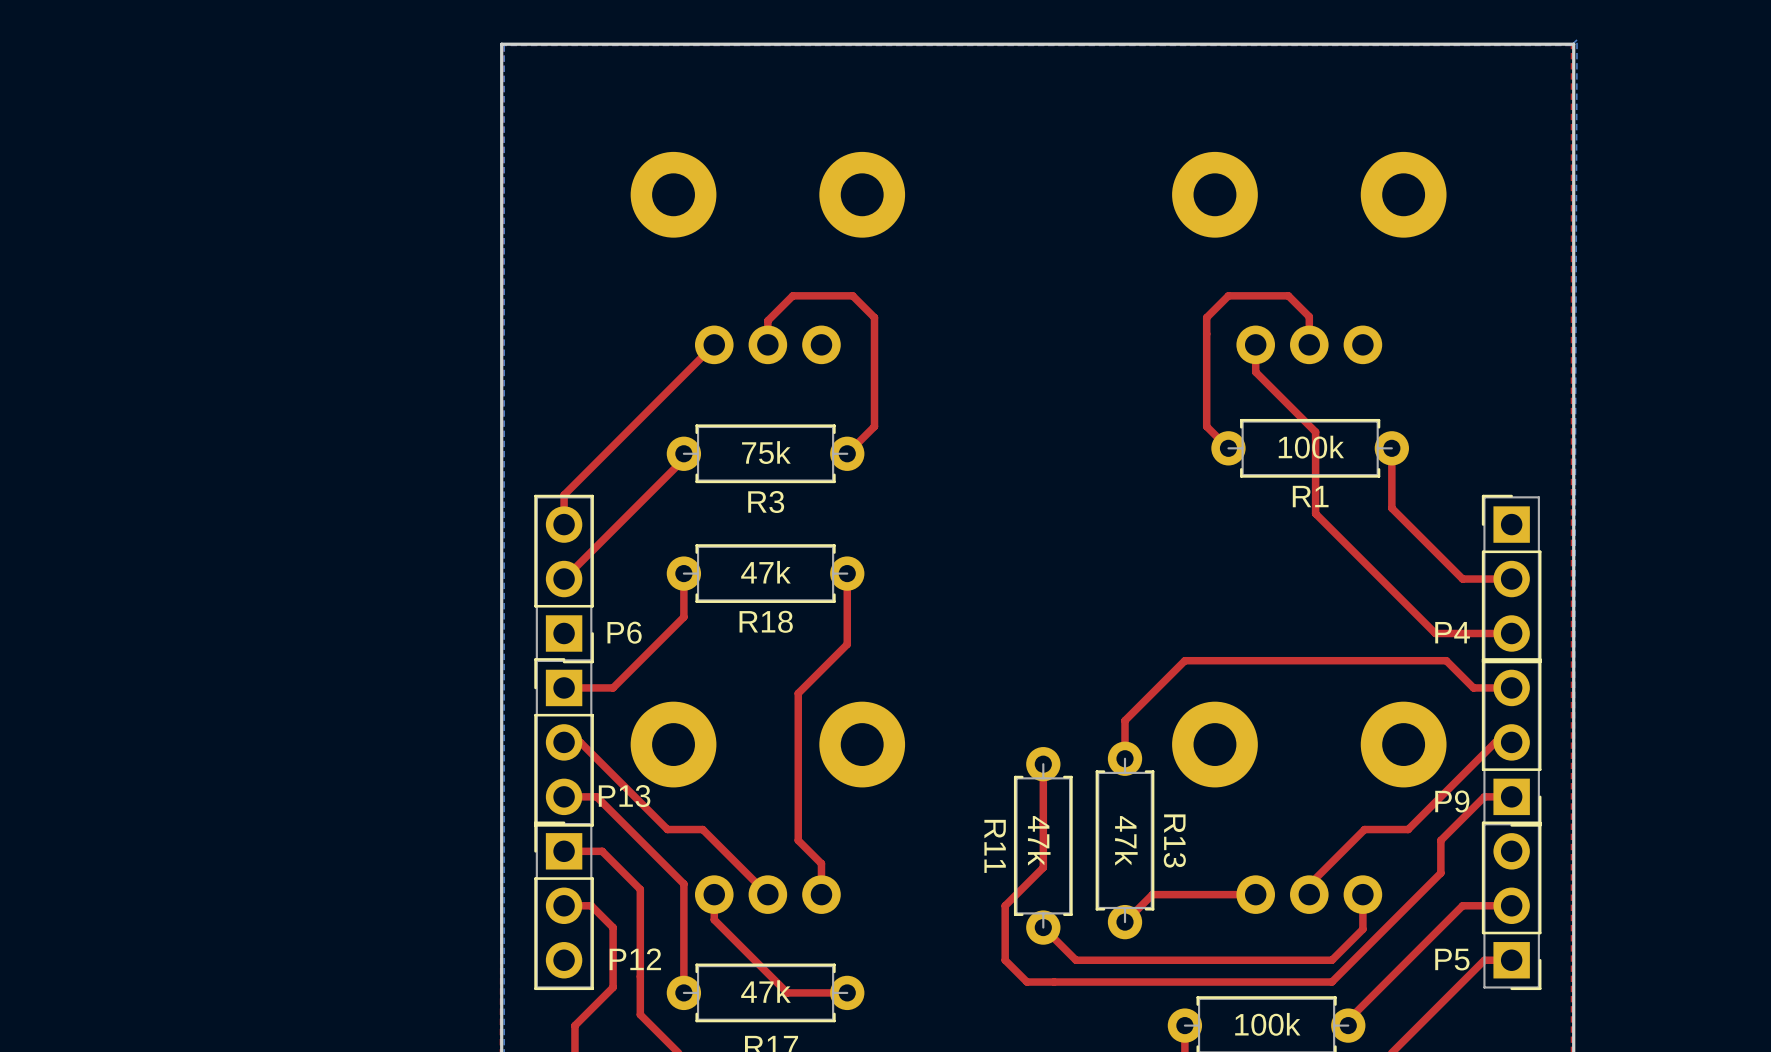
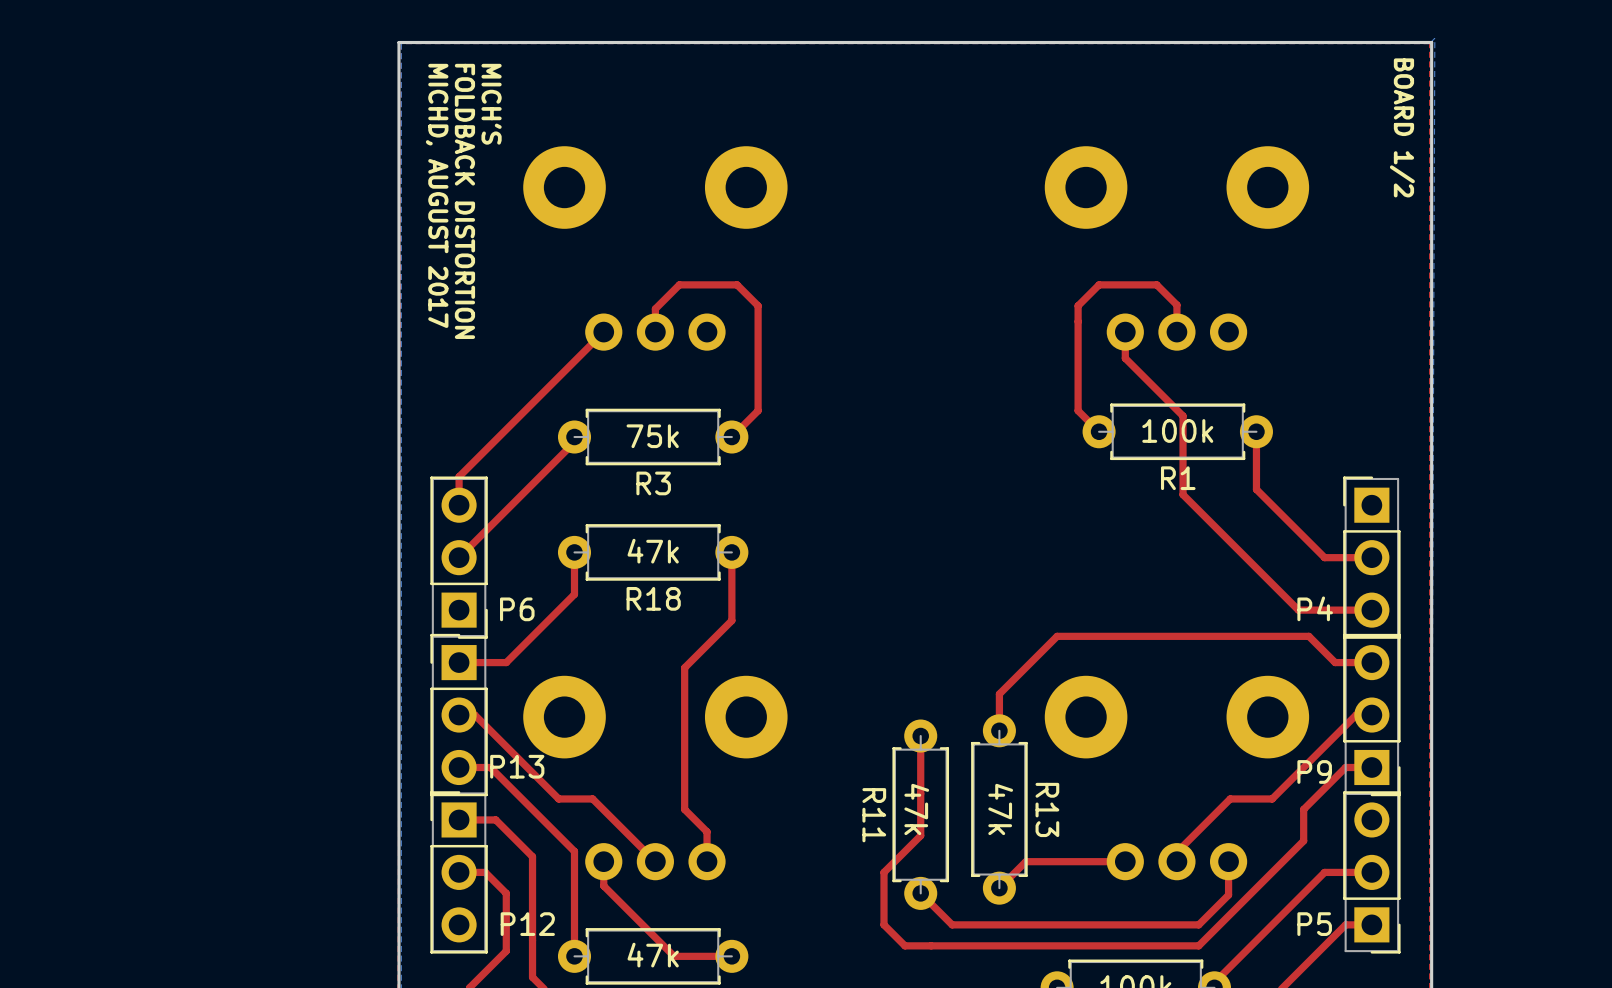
text: none -> MICH'S (491, 104)
text: none -> BOARD 1/2 (1402, 127)
text: none -> MICHD, AUGUST 2017 (437, 195)
text: none -> FOLDBACK DISTORTION (464, 201)

